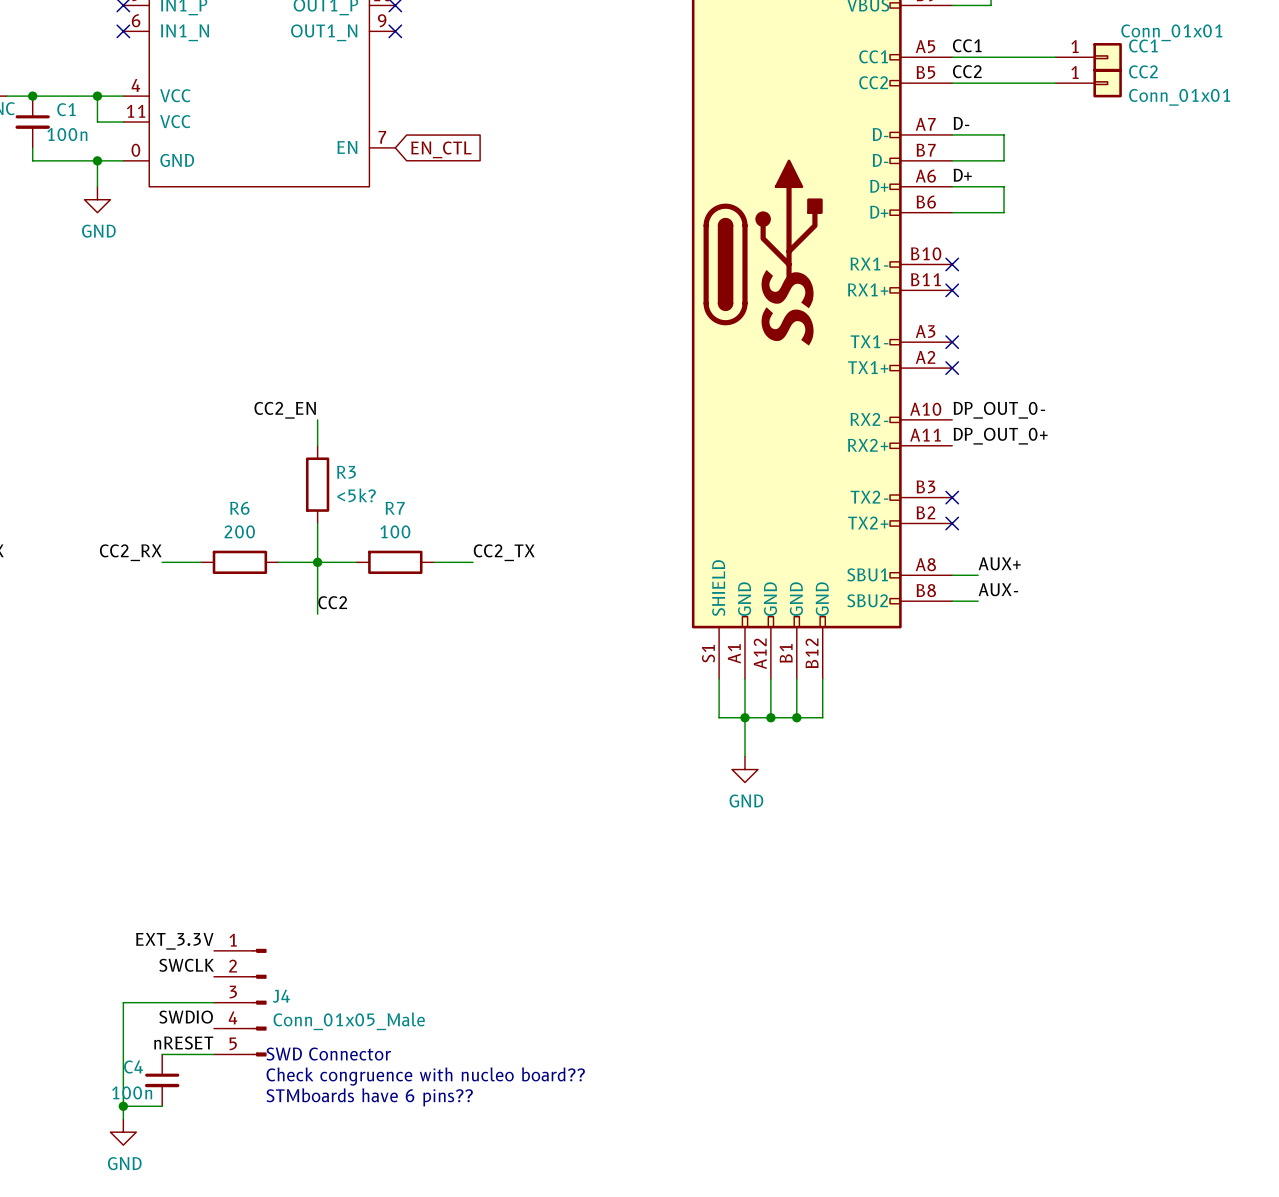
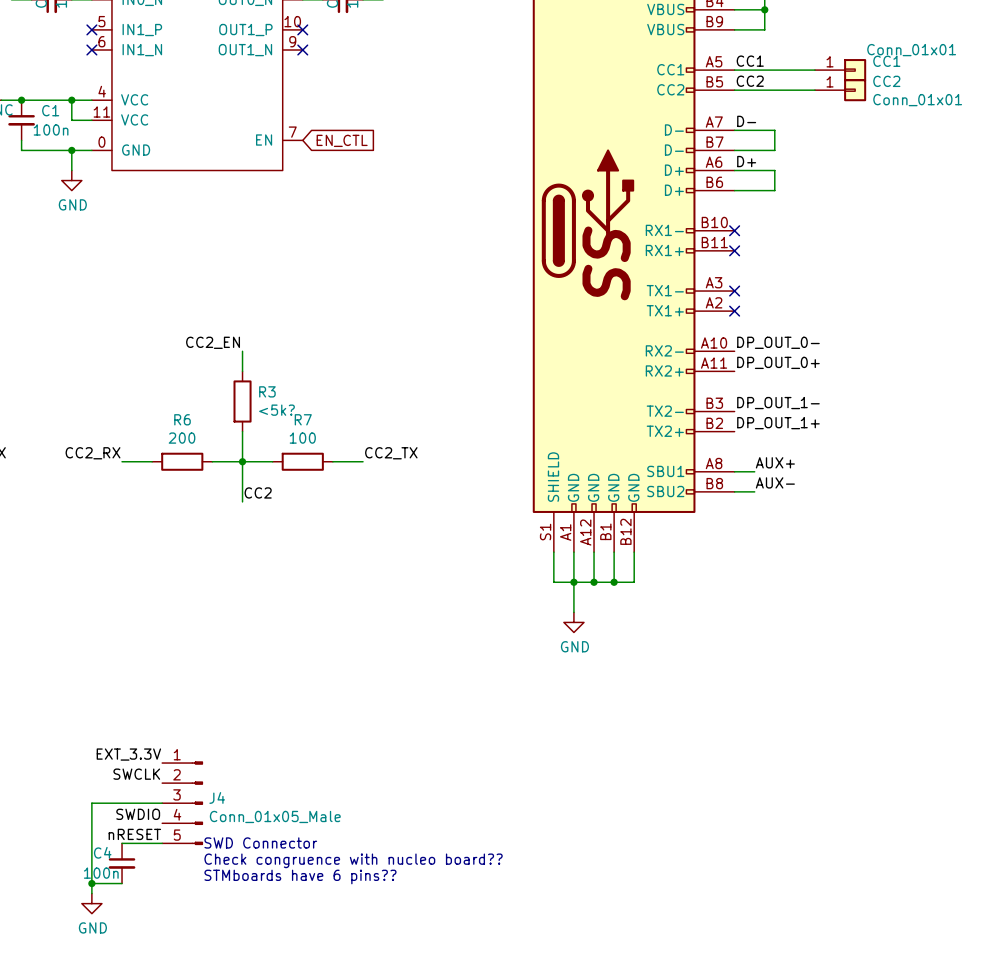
label: none -> DP_OUT_1- (778, 403)
no-connect mark: (952, 497) -> none
label: none -> DP_OUT_1+ (778, 423)
no-connect mark: (952, 523) -> none

